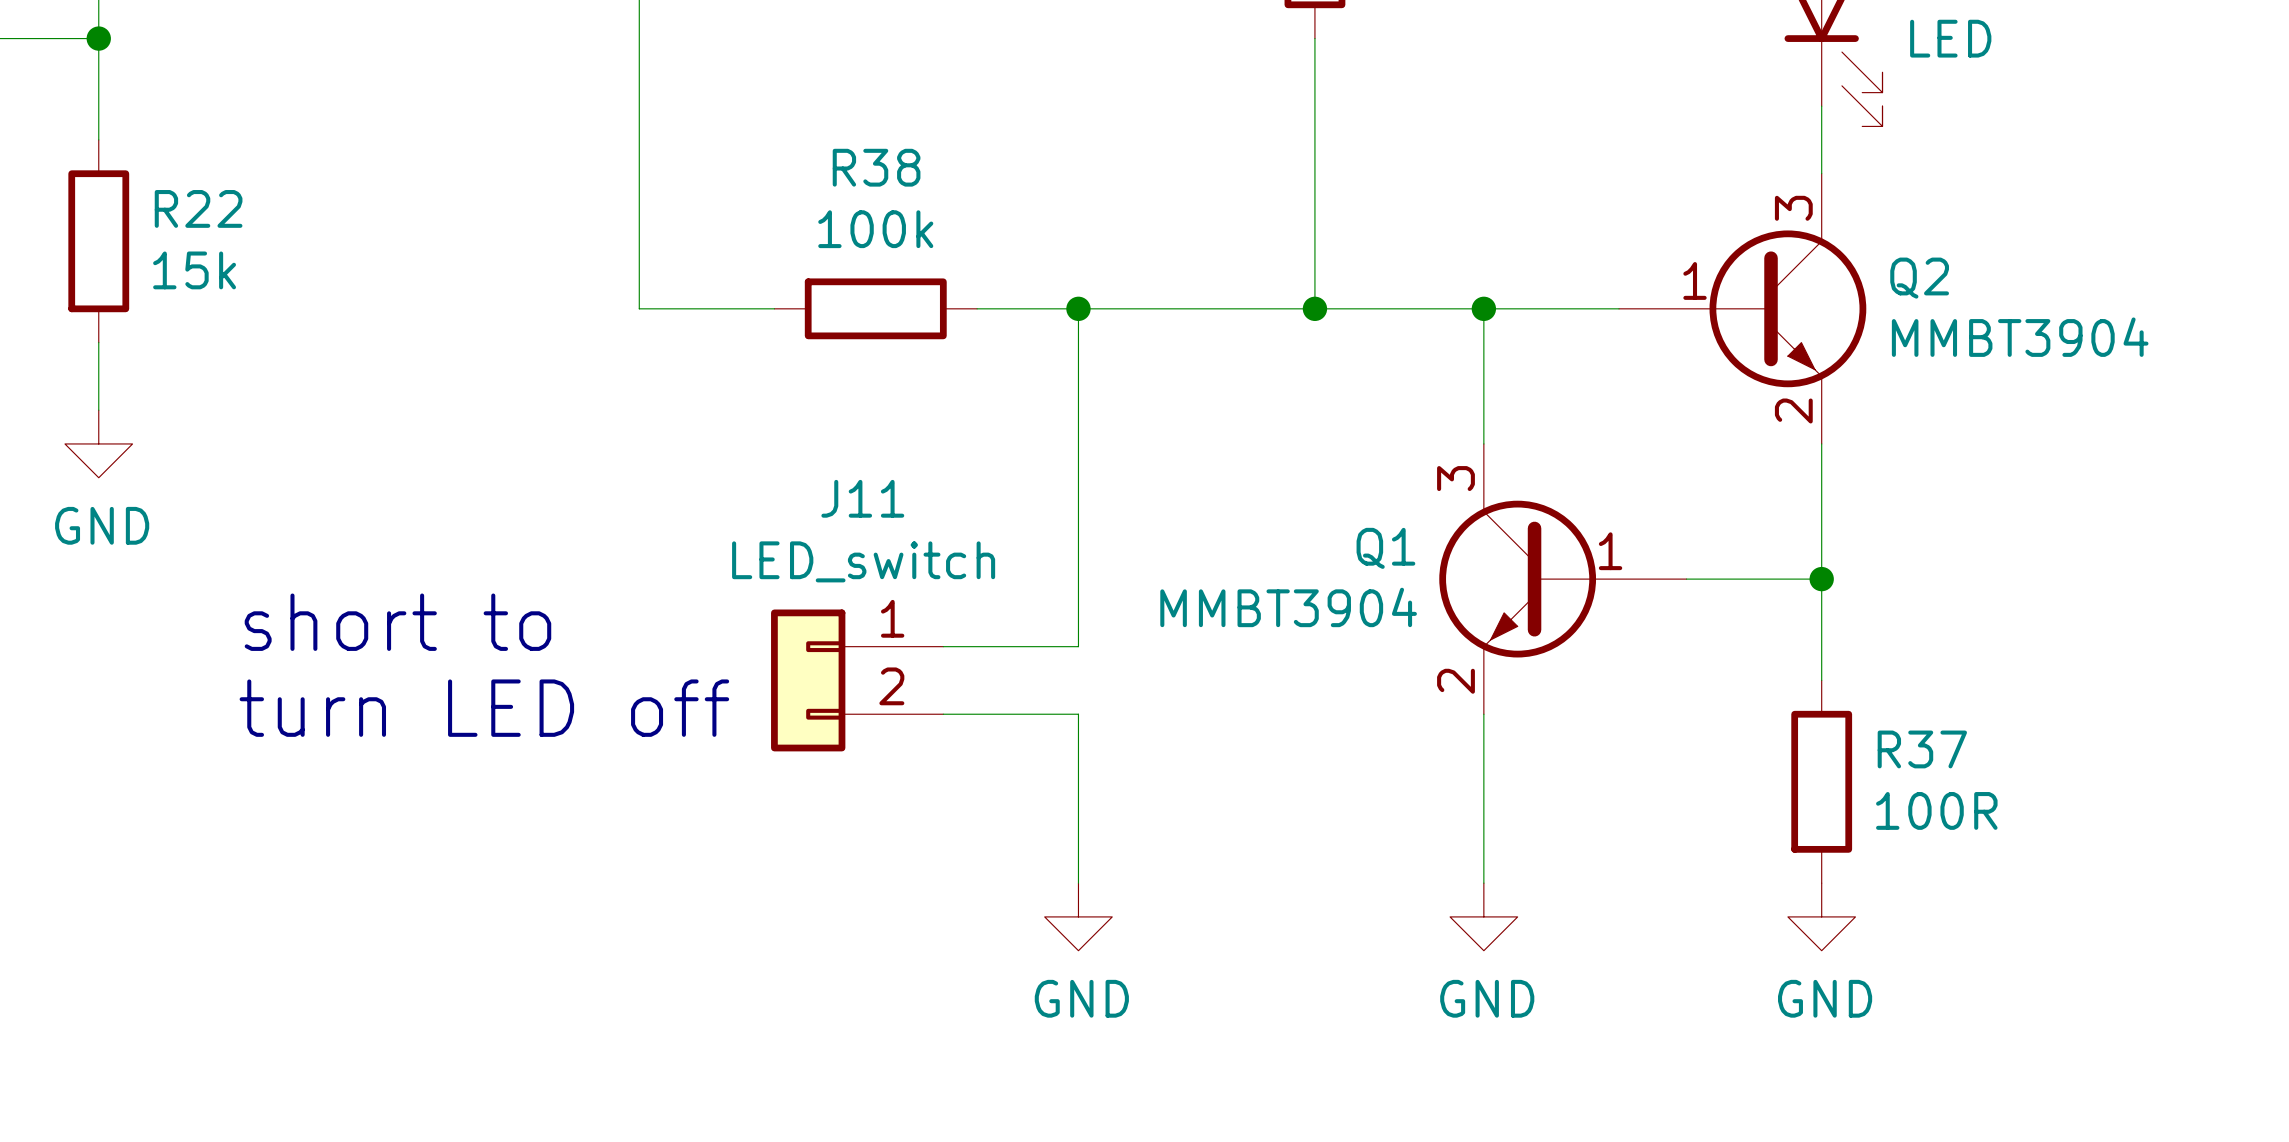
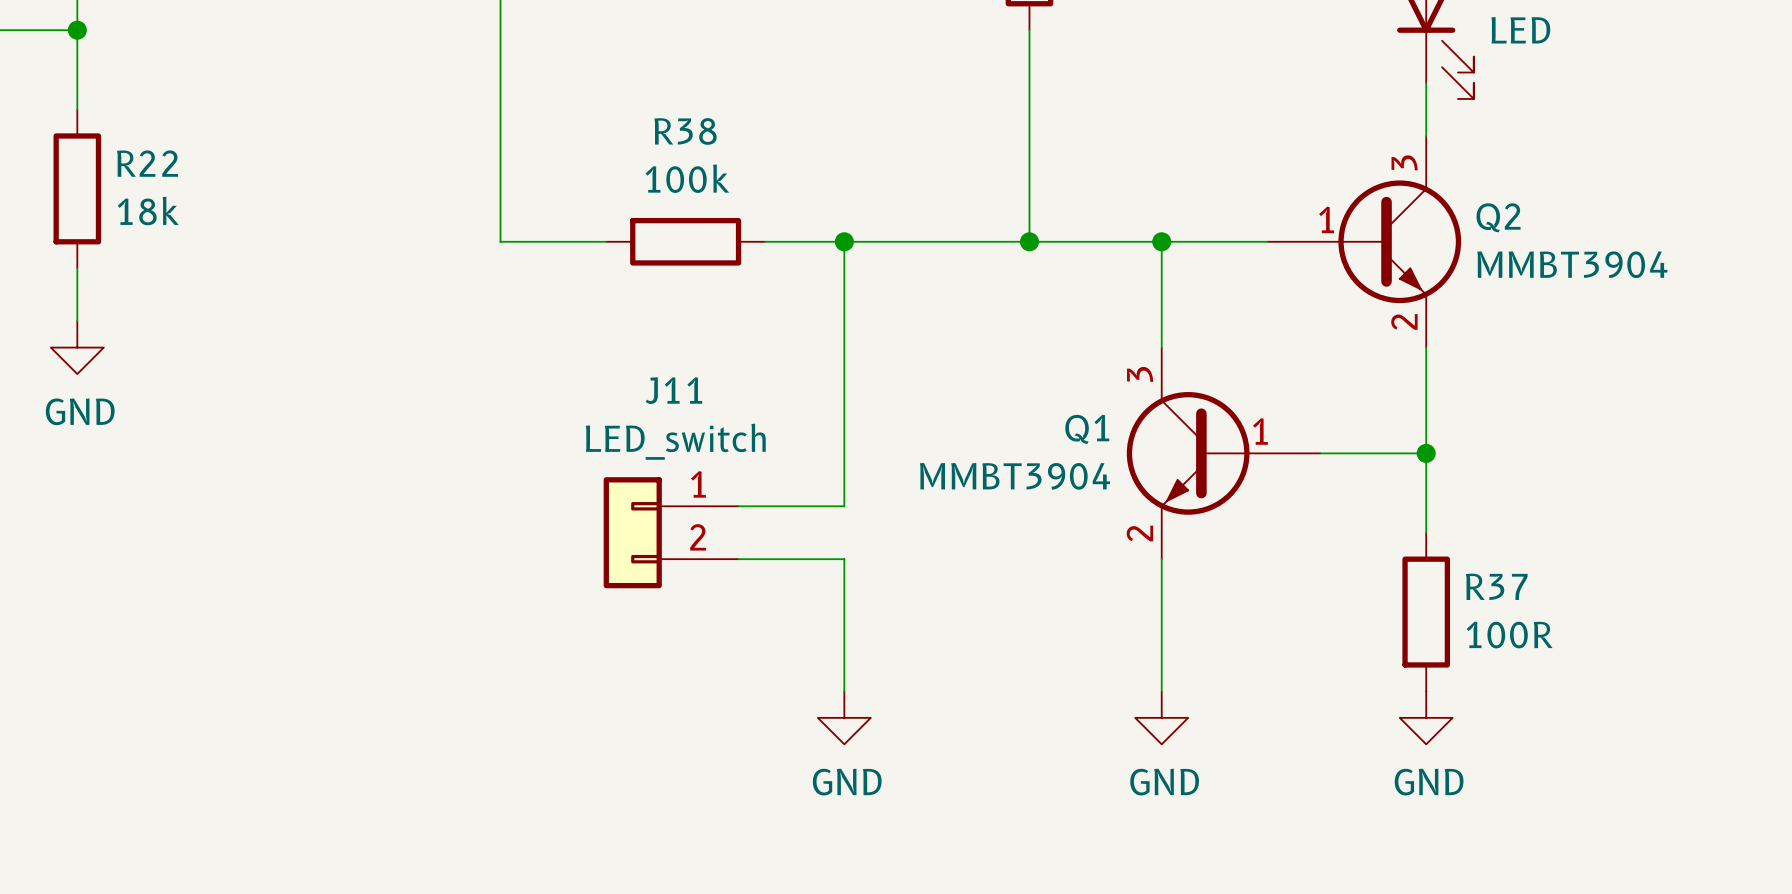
R22 value: 15k (194, 270) -> 18k (148, 210)
text: short to (397, 622) -> none
text: turn LED off (484, 708) -> none

